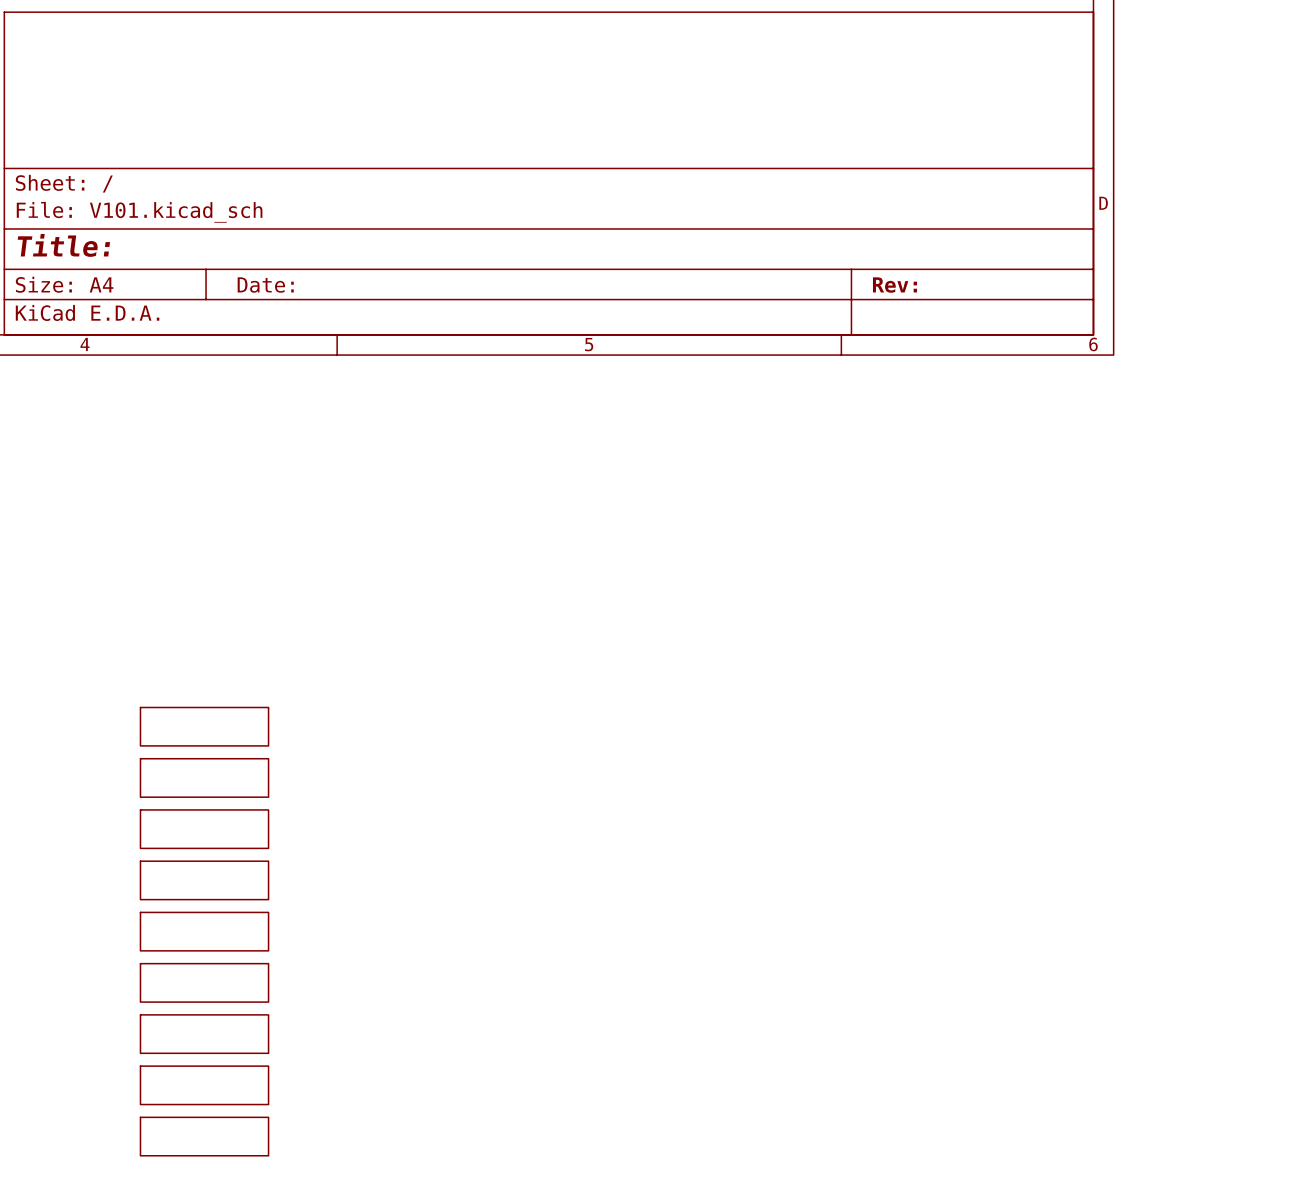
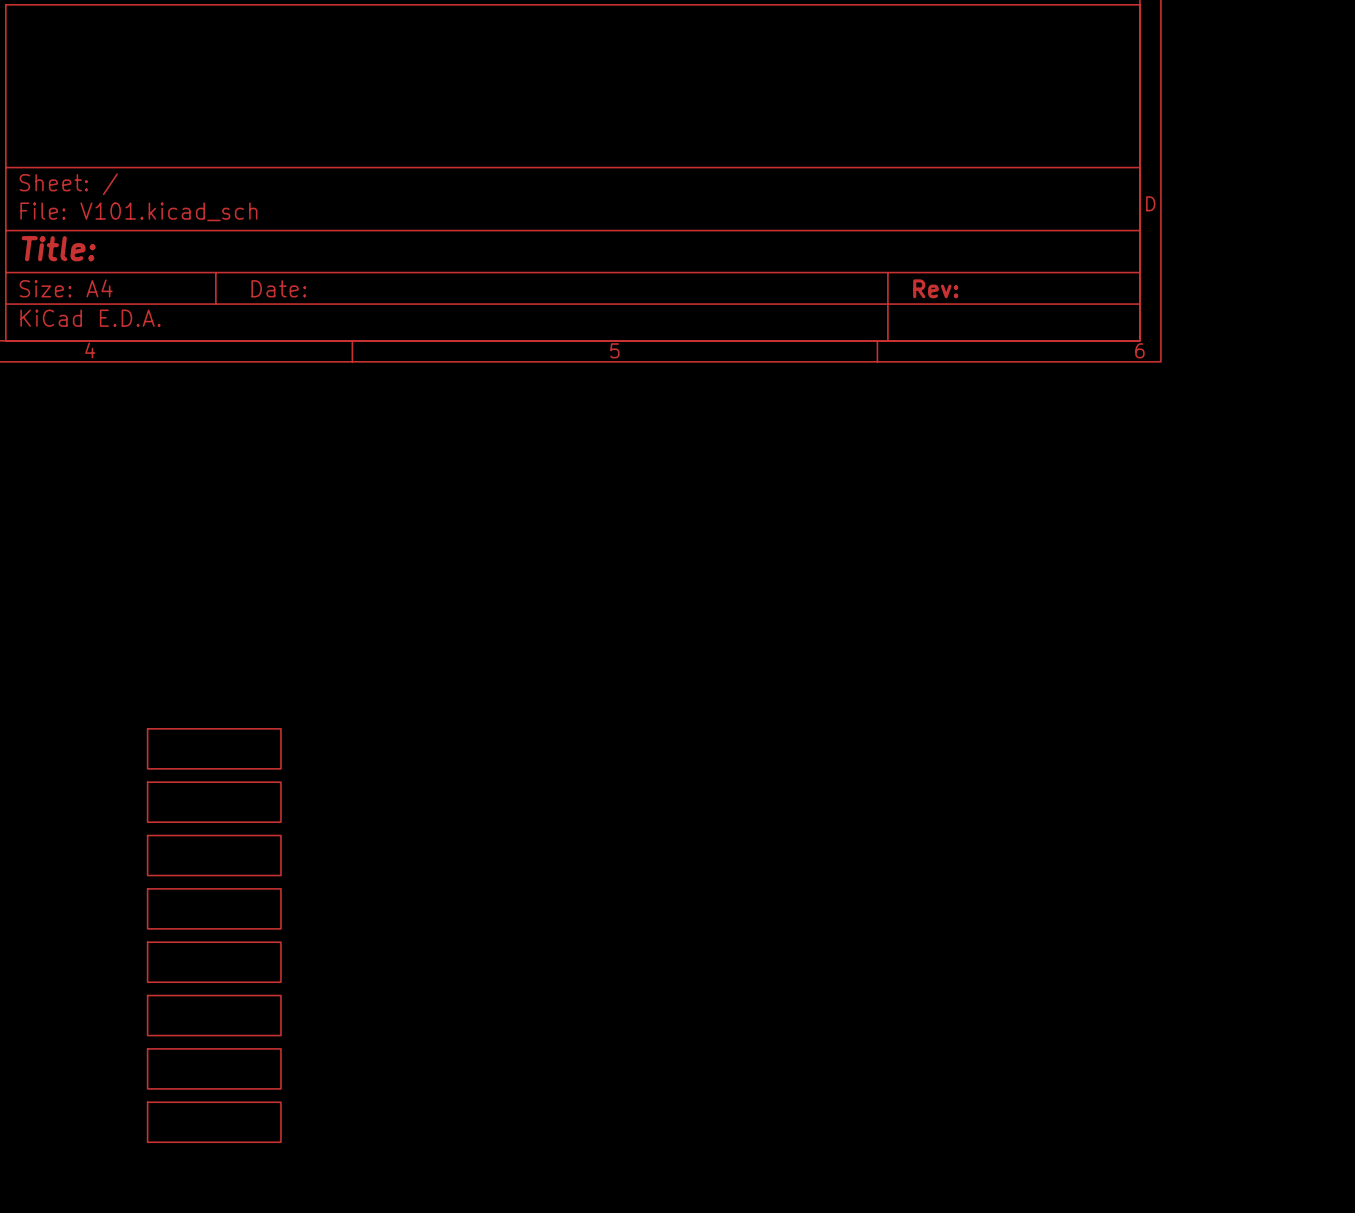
sheet: (204, 1136) -> none

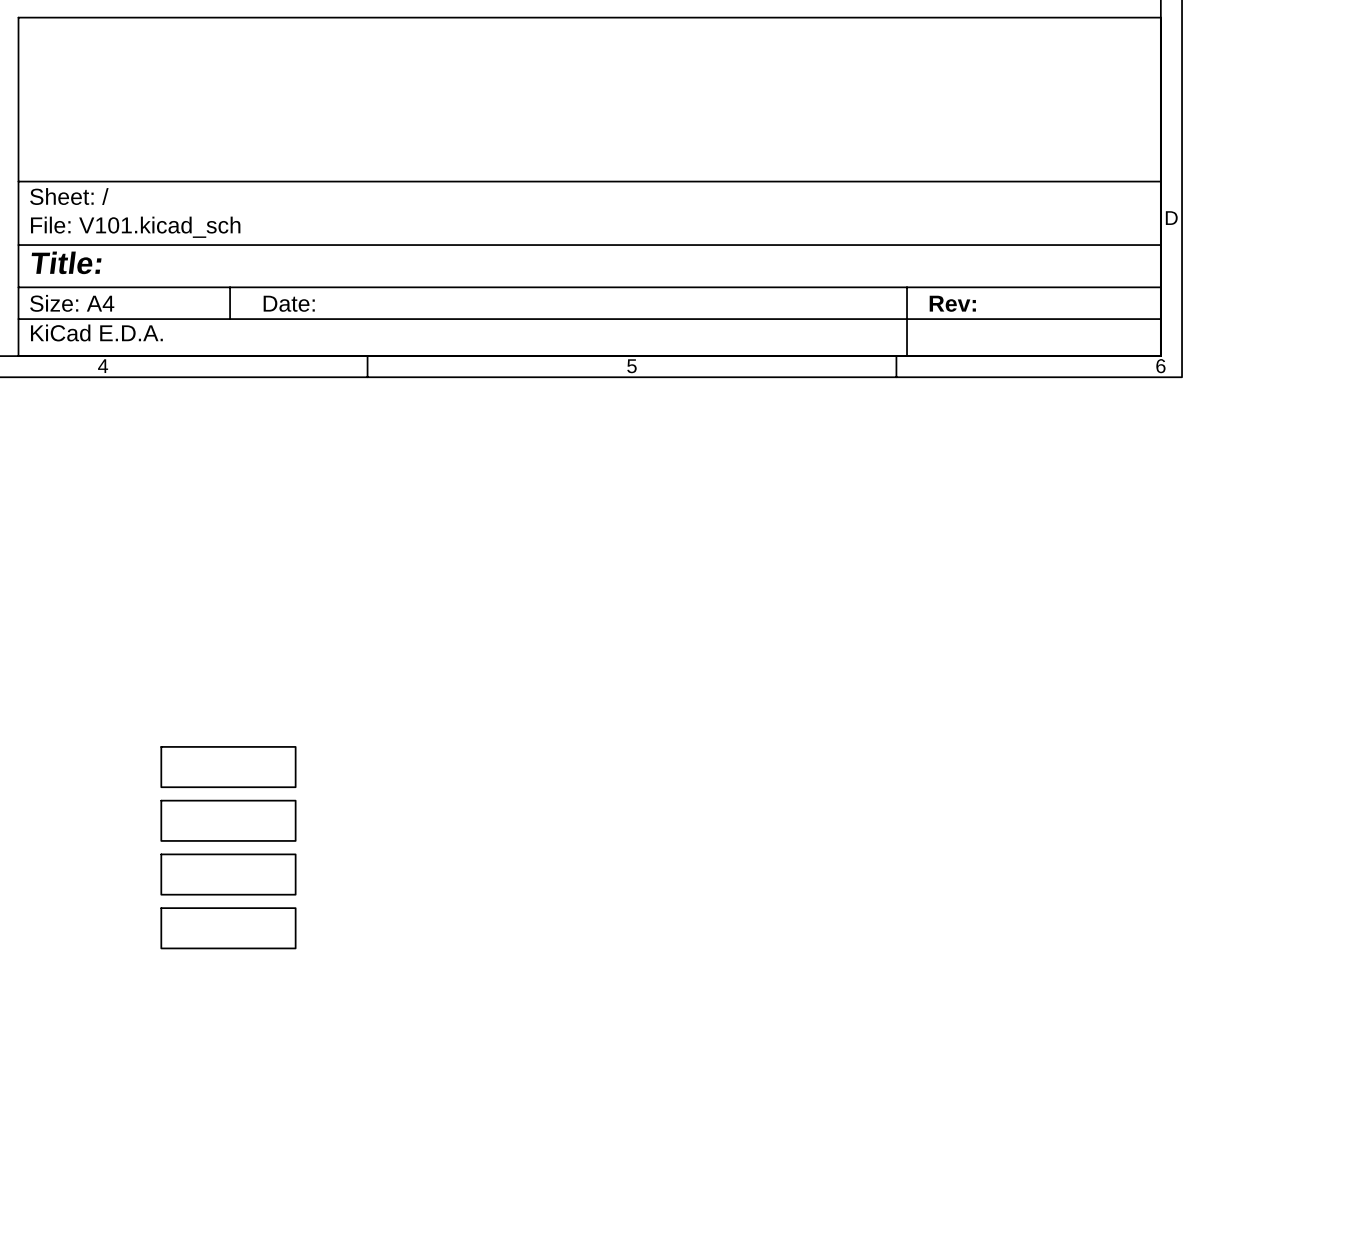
sheet: (214, 962) -> none
sheet: (214, 1015) -> none
sheet: (214, 1068) -> none
sheet: (214, 1122) -> none

